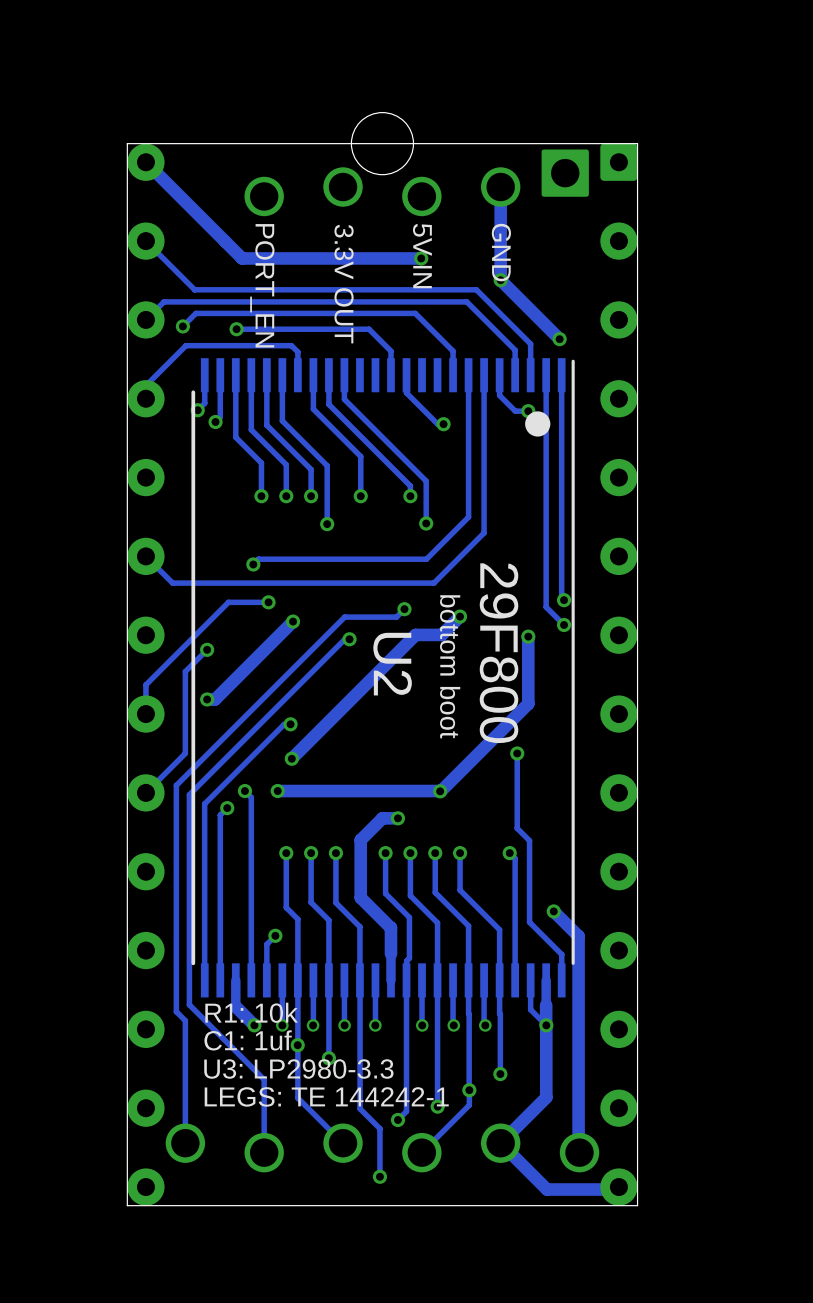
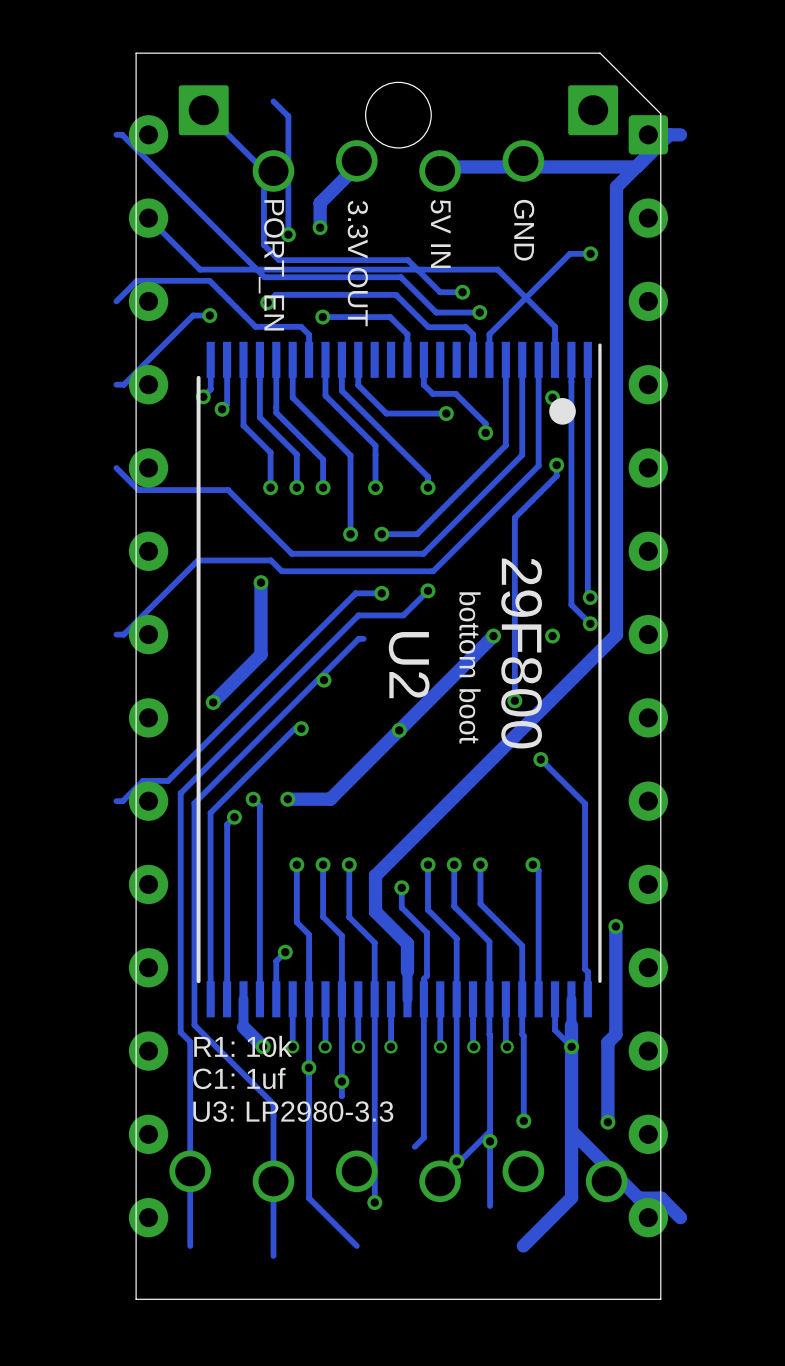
track: none -> (273, 101) (288, 116) (288, 234)
track: none -> (203, 110) (263, 170) (263, 245) (279, 260) (408, 260) (440, 292) (462, 292)
part: none -> (203, 110)
board edge: (637, 143) (127, 143) (127, 1205) (637, 1205) (637, 143) -> (600, 53) (660, 113) (660, 1299) (136, 1299) (136, 53) (600, 53)
track: none -> (116, 134) (122, 134) (264, 277) (400, 277) (436, 312) (479, 312)
track: (145, 162) (242, 258) (421, 258) -> none
part position: (565, 173) -> (593, 110)
track: (500, 187) (500, 280) (559, 339) -> none
track: none -> (356, 166) (320, 203) (320, 227)
track: none -> (636, 166) (438, 166)
via: none -> (320, 227)
via: none -> (288, 234)
via: (421, 258) -> none
via: none -> (590, 253)
via: (500, 280) -> none
via: none -> (462, 292)
track: (145, 319) (163, 301) (466, 301) (515, 350) (515, 375) -> (116, 634) (123, 634) (197, 560) (271, 560) (281, 571) (433, 571) (538, 465) (538, 359)
via: none -> (267, 302)
track: (182, 326) (195, 313) (415, 313) (446, 344) -> (267, 302) (275, 294) (396, 294) (428, 327) (465, 327)
via: (182, 326) -> none
track: (236, 329) (369, 329) (374, 334) -> (322, 317) (390, 317)
via: (236, 329) -> none
via: none -> (479, 312)
track: none -> (209, 315) (193, 315) (123, 384) (116, 384)
via: none -> (209, 315)
via: none -> (322, 317)
via: (559, 339) -> none
track: (297, 352) (291, 345) (185, 345) (145, 385) (145, 398) -> (309, 334) (301, 326) (255, 326) (209, 280) (136, 280) (116, 301)
track: (468, 375) (468, 517) (426, 559) (258, 559) (253, 564) -> (489, 359) (489, 334) (569, 253) (590, 253)
track: (406, 392) (437, 424) (443, 424) -> (423, 378) (423, 384) (432, 393) (455, 393) (485, 423) (485, 432)
track: (499, 395) (515, 411) (528, 411) -> (522, 381) (522, 455) (423, 553) (291, 553) (228, 490) (138, 490) (116, 467)
track: (282, 411) (282, 420) (327, 465) (327, 524) -> (292, 397) (350, 455) (350, 534)
via: (443, 424) -> none
track: (371, 426) (426, 481) (426, 523) -> (386, 413) (446, 413)
via: none -> (446, 413)
via: none -> (485, 432)
track: (484, 456) (484, 532) (433, 583) (172, 583) (145, 556) -> (505, 445) (417, 534) (381, 534)
track: none -> (556, 465) (556, 475) (514, 517) (514, 700)
via: none -> (556, 465)
via: (426, 523) -> none
via position: (327, 524) -> (350, 534)
via: none -> (381, 534)
via: (253, 564) -> none
via: none -> (261, 582)
track: none -> (381, 593) (355, 593) (168, 780) (142, 780) (122, 801) (116, 801)
via: none -> (381, 593)
track: (268, 602) (228, 602) (145, 684) (145, 714) -> none
via: (268, 602) -> none
track: (404, 609) (396, 617) (387, 617) -> (428, 590) (403, 615)
via position: (404, 609) -> (428, 590)
track: (460, 616) (441, 634) (415, 634) (291, 758) -> none
via position: (460, 616) -> (493, 636)
track: (293, 621) (215, 699) (207, 699) -> (261, 582) (261, 654) (213, 702)
via: (293, 621) -> none
track: (528, 636) (528, 703) (440, 791) -> none
via: (349, 639) -> none
track: (207, 649) (185, 671) (185, 753) (145, 792) -> none
via: (207, 649) -> none
via: none -> (324, 680)
via: none -> (514, 700)
via: none -> (399, 730)
track: (517, 753) (517, 828) (529, 840) (529, 922) (559, 951) -> (540, 759) (585, 803) (585, 969)
via: (291, 758) -> none
track: (439, 791) (318, 791) -> (493, 636) (330, 799)
via: (440, 791) -> none
track: (397, 818) (382, 818) (360, 840) (360, 863) -> (680, 134) (668, 134) (616, 186) (616, 634) (375, 875)
via: (397, 818) -> none
track: (385, 853) (385, 874) -> none
via position: (385, 853) -> (401, 887)
track: (553, 911) (578, 936) (579, 1152) -> none
via position: (553, 911) -> (615, 926)
track: none -> (615, 926) (615, 1034) (607, 1042) (607, 1122)
text position: R1: 10k (251, 1012) -> R1: 10k (243, 1046)
track: (500, 1014) (500, 1074) -> (523, 1035) (523, 1121)
text position: C1: 1uf (248, 1040) -> C1: 1uf (239, 1078)
track: none -> (341, 1081) (341, 1095)
text position: U3: LP2980-3.3 (298, 1069) -> U3: LP2980-3.3 (293, 1111)
via: (500, 1074) -> none
via: (469, 1090) -> none
via: none -> (523, 1121)
text: LEGS: TE 144242-1 (326, 1096) -> none
via: none -> (607, 1122)
track: (546, 1097) (500, 1143) (547, 1189) (616, 1189) (618, 1187) -> (571, 1123) (571, 1197) (523, 1245)
track: (297, 1098) (343, 1143) -> (309, 1123) (309, 1198) (356, 1245)
track: none -> (571, 1131) (638, 1198) (660, 1198) (680, 1217)
track: none -> (456, 1132) (456, 1161)
via: (437, 1106) -> none
track: (360, 1108) (379, 1128) (379, 1176) -> (374, 1134) (374, 1202)
via: none -> (490, 1141)
via: (397, 1120) -> none
via: none -> (456, 1161)
track: none -> (190, 1171) (190, 1245)
track: none -> (273, 1181) (273, 1255)
via position: (379, 1176) -> (374, 1202)

